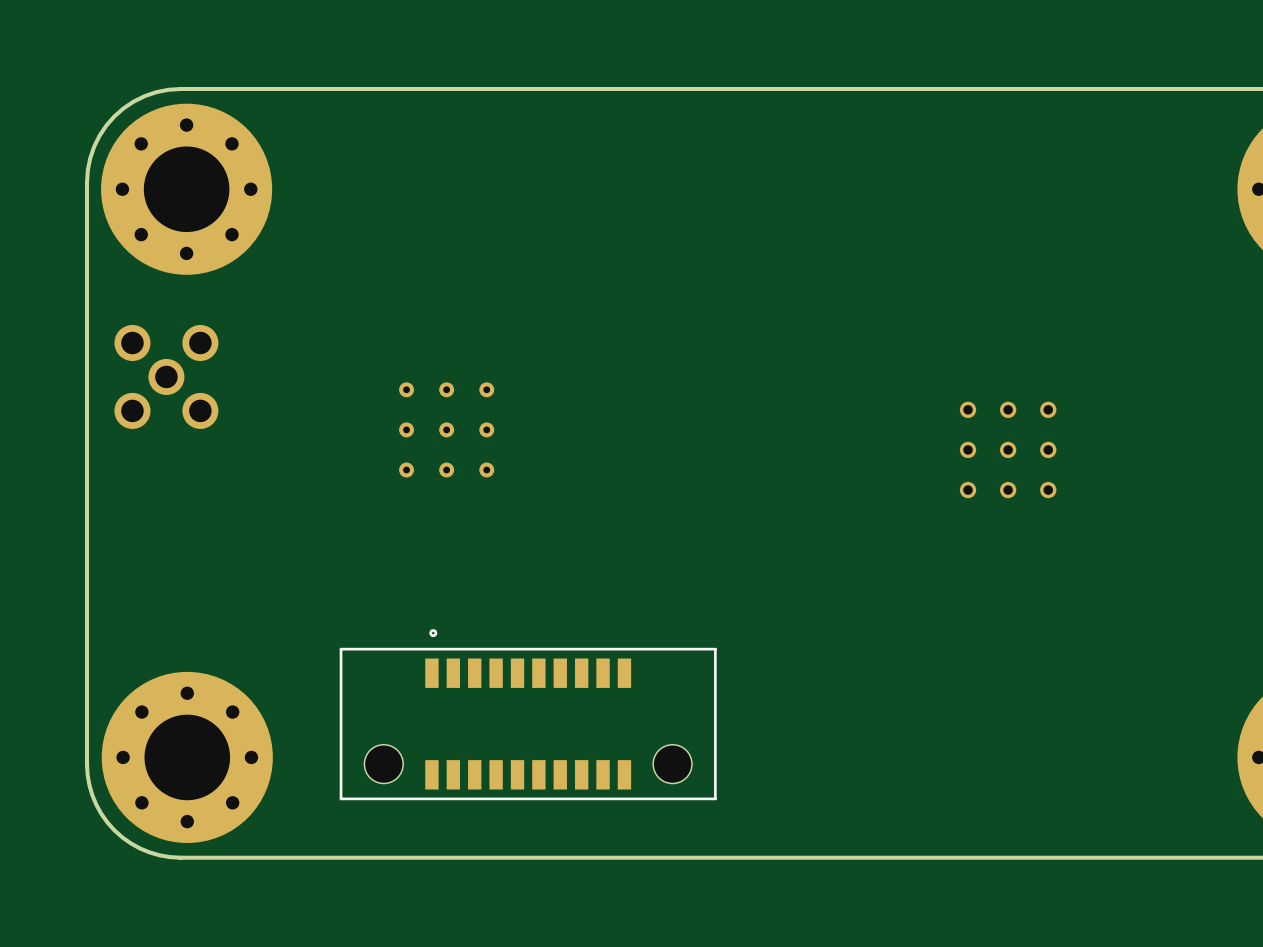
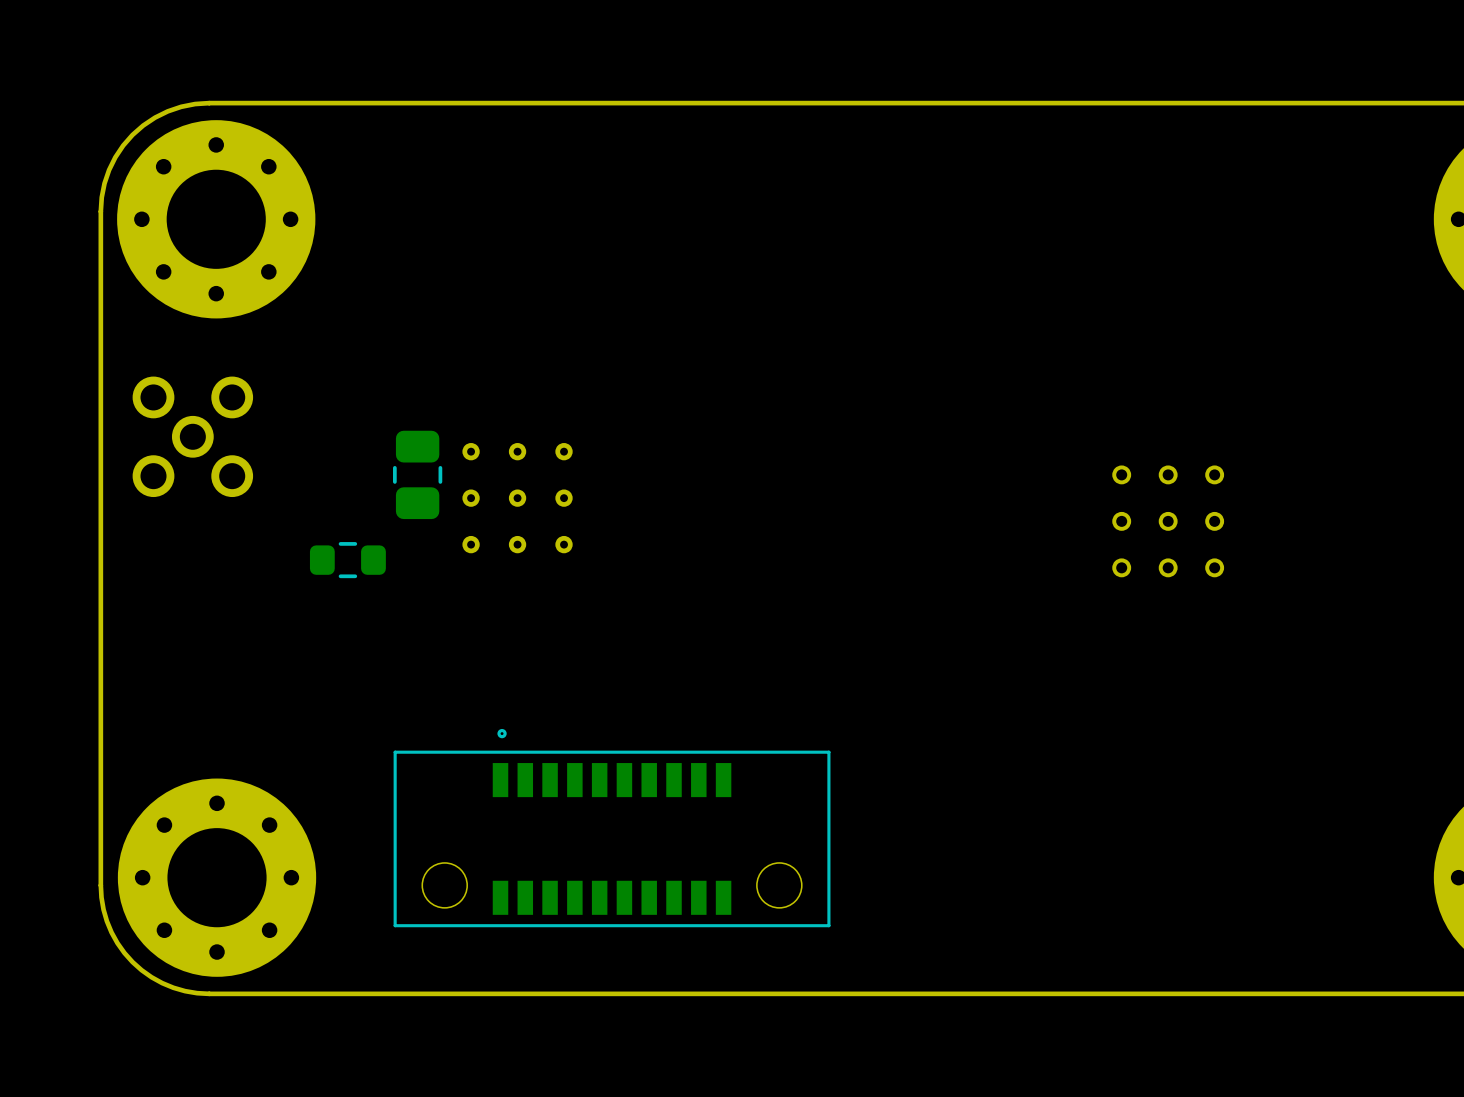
part: none -> (417, 474)
part: none -> (347, 560)

